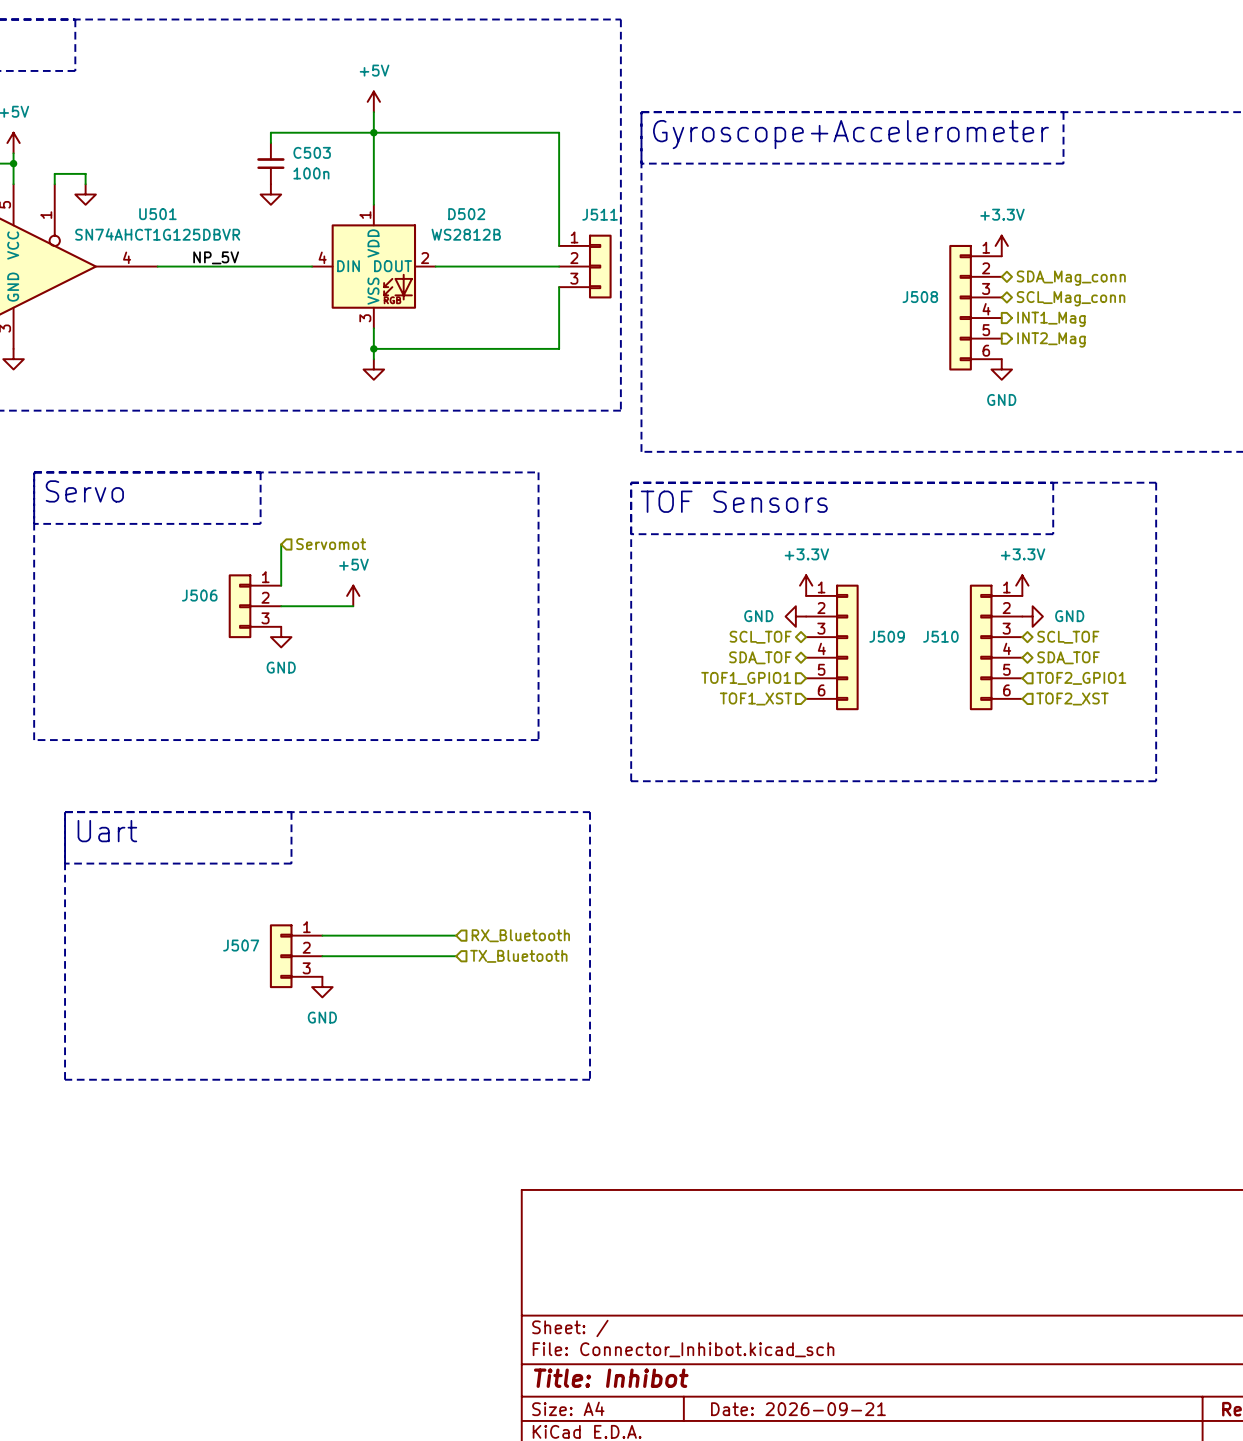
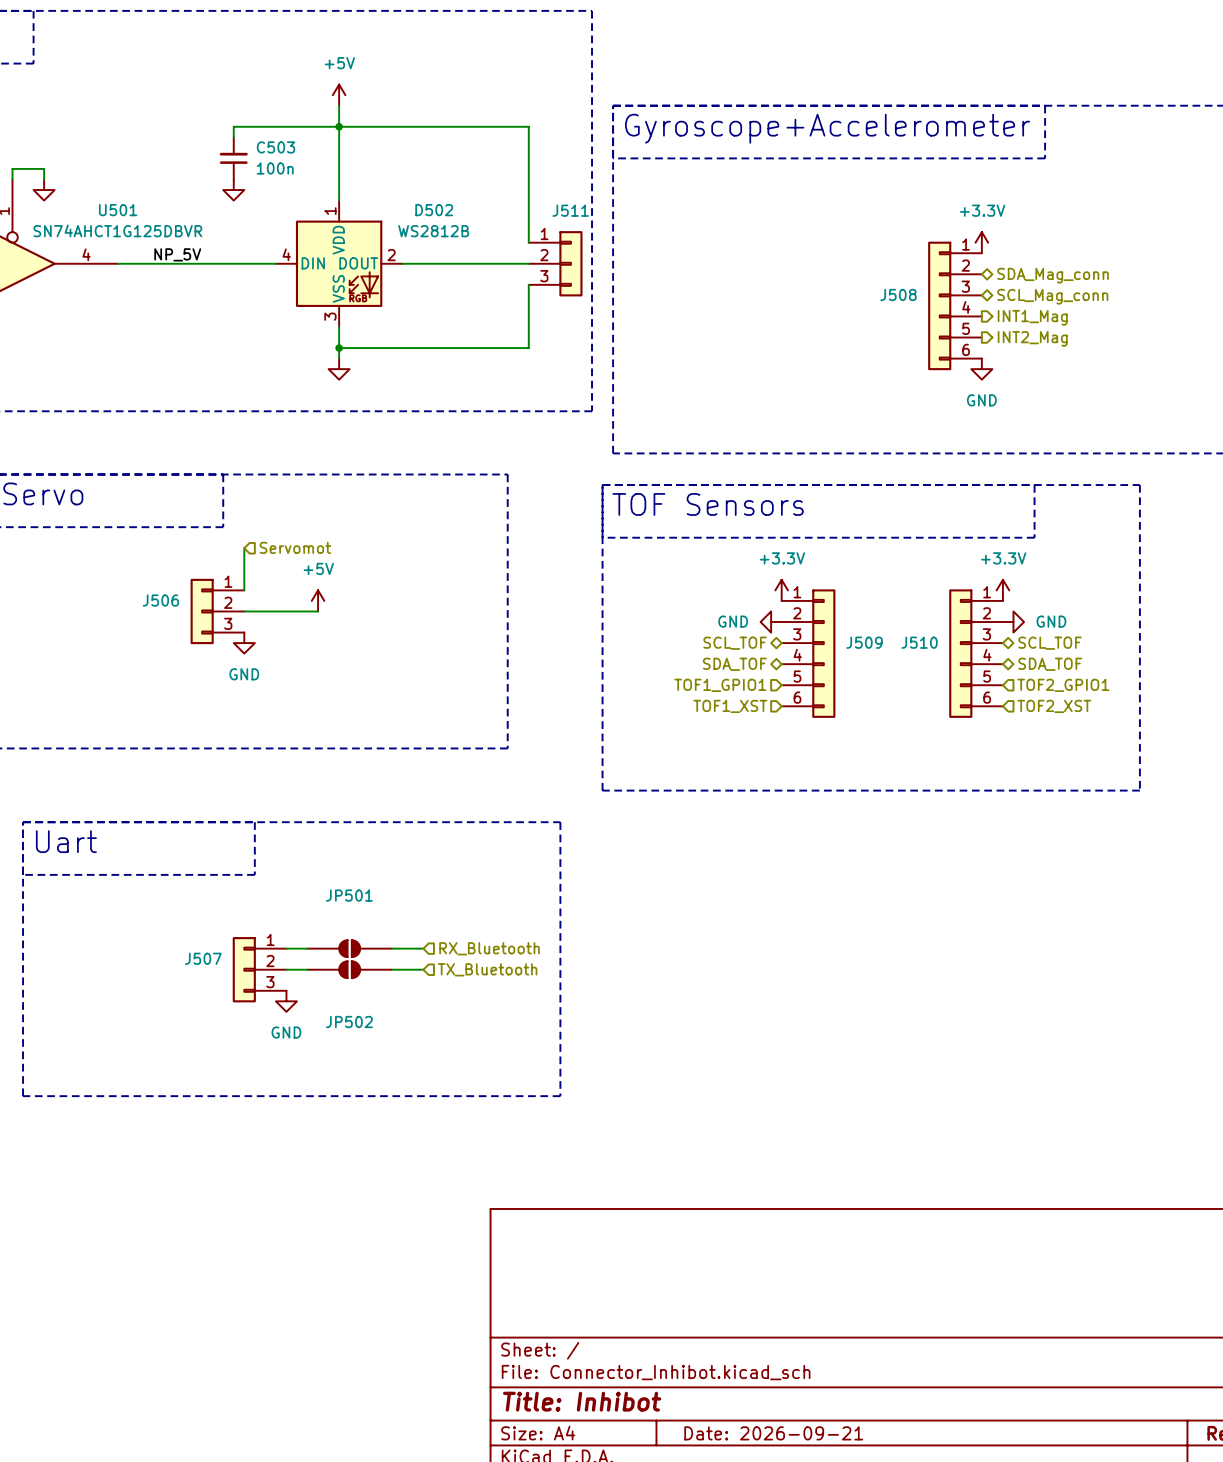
JP501: none -> (349, 948)
JP502: none -> (349, 969)

